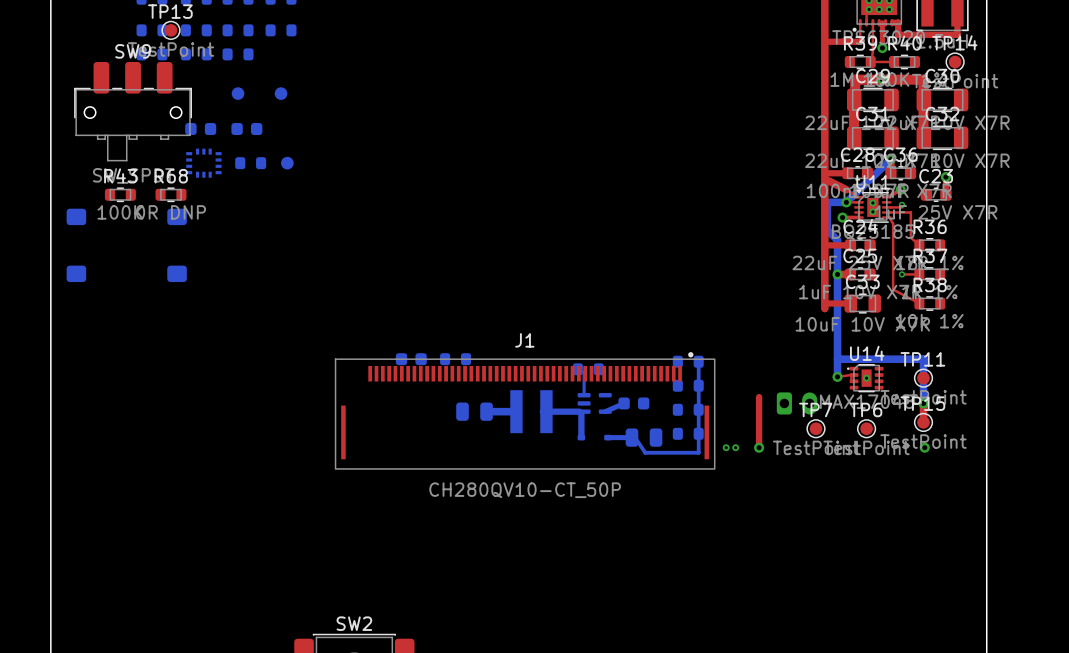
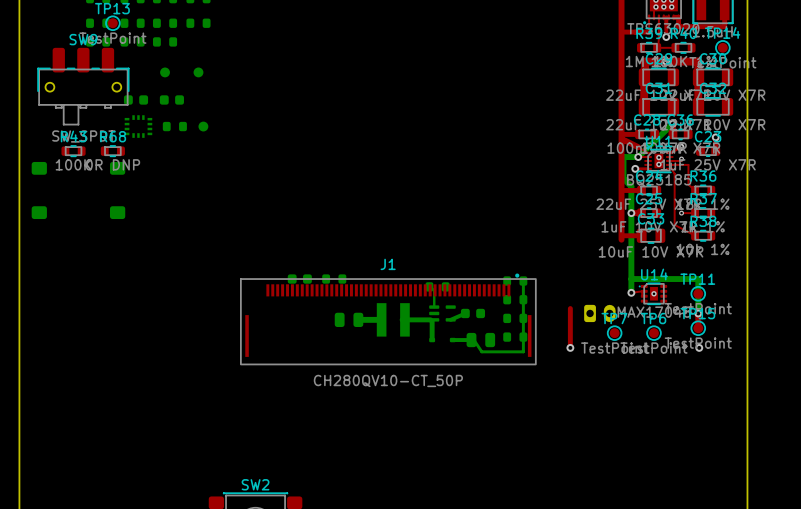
via: (726, 447) -> none
via: (735, 447) -> none

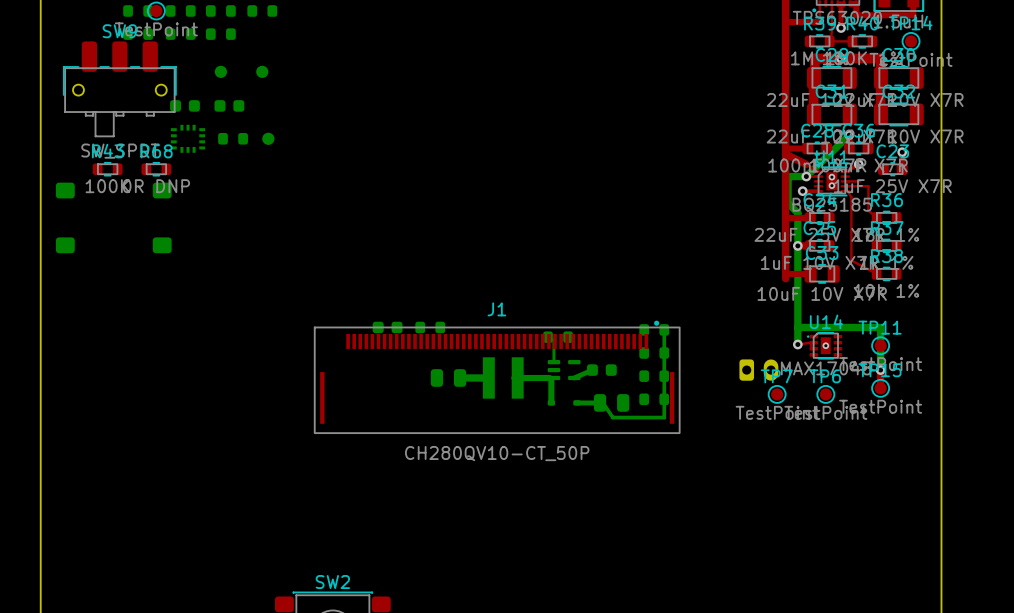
via: (681, 159) -> none
top track: (681, 213) (691, 213) -> none
via: (681, 213) -> none
top track: (570, 308) (570, 347) -> none
via: (570, 347) -> none
via: (699, 347) -> none

